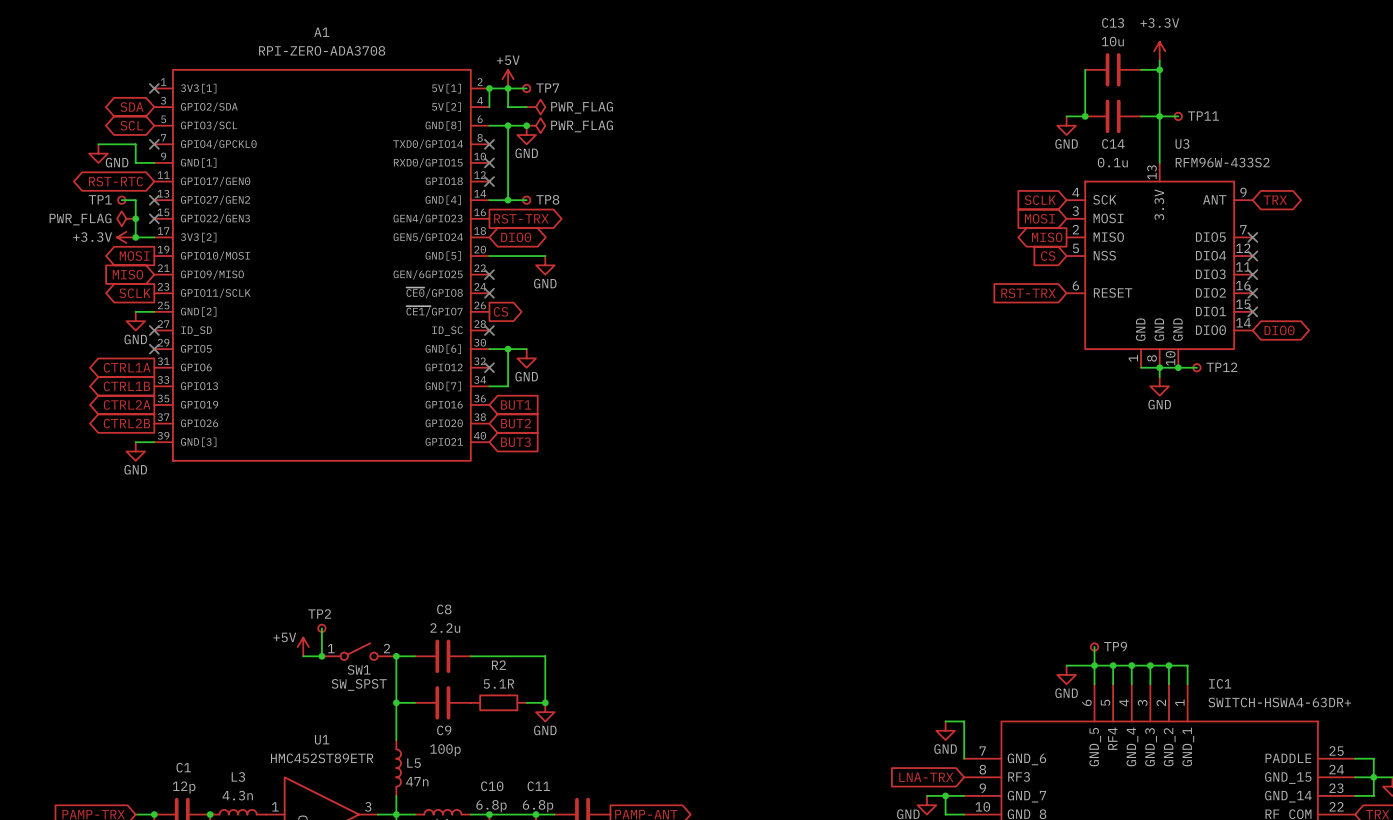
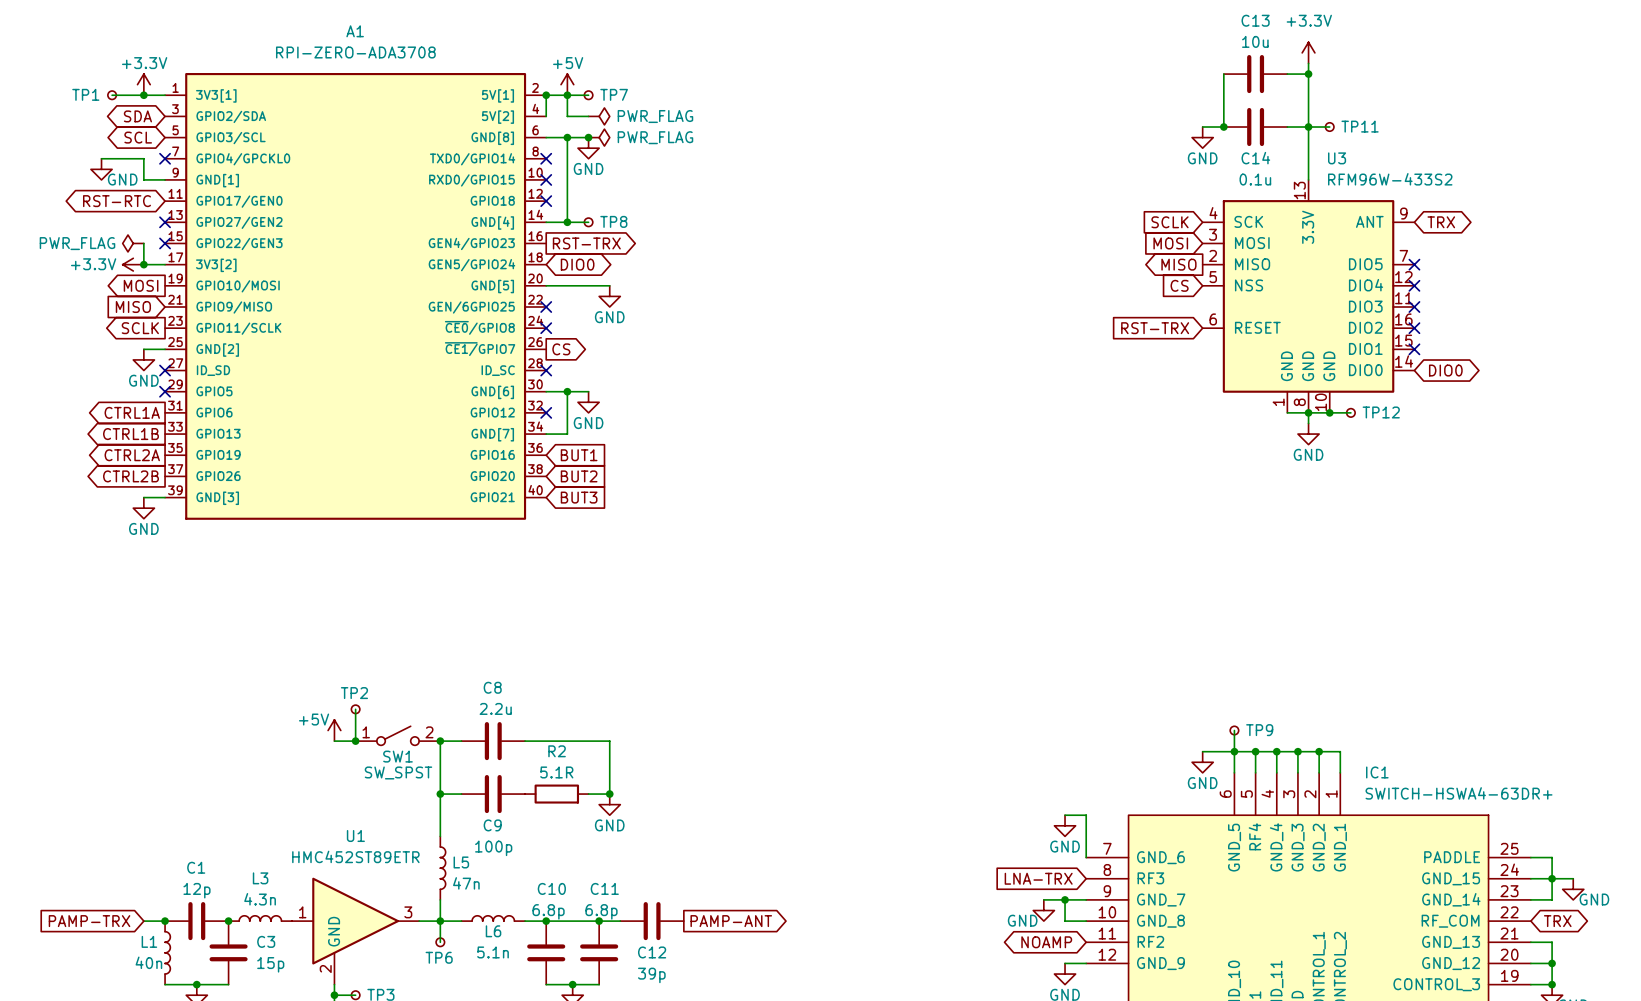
power symbol: none -> +3.3V (143, 84)
wire: none -> (112, 95) (165, 95)
junction: none -> (143, 95)
no-connect mark: (154, 88) -> none
wire: (121, 200) (135, 200) (135, 218) -> none
TP1 position: (121, 200) -> (112, 95)
junction: (135, 218) -> none

